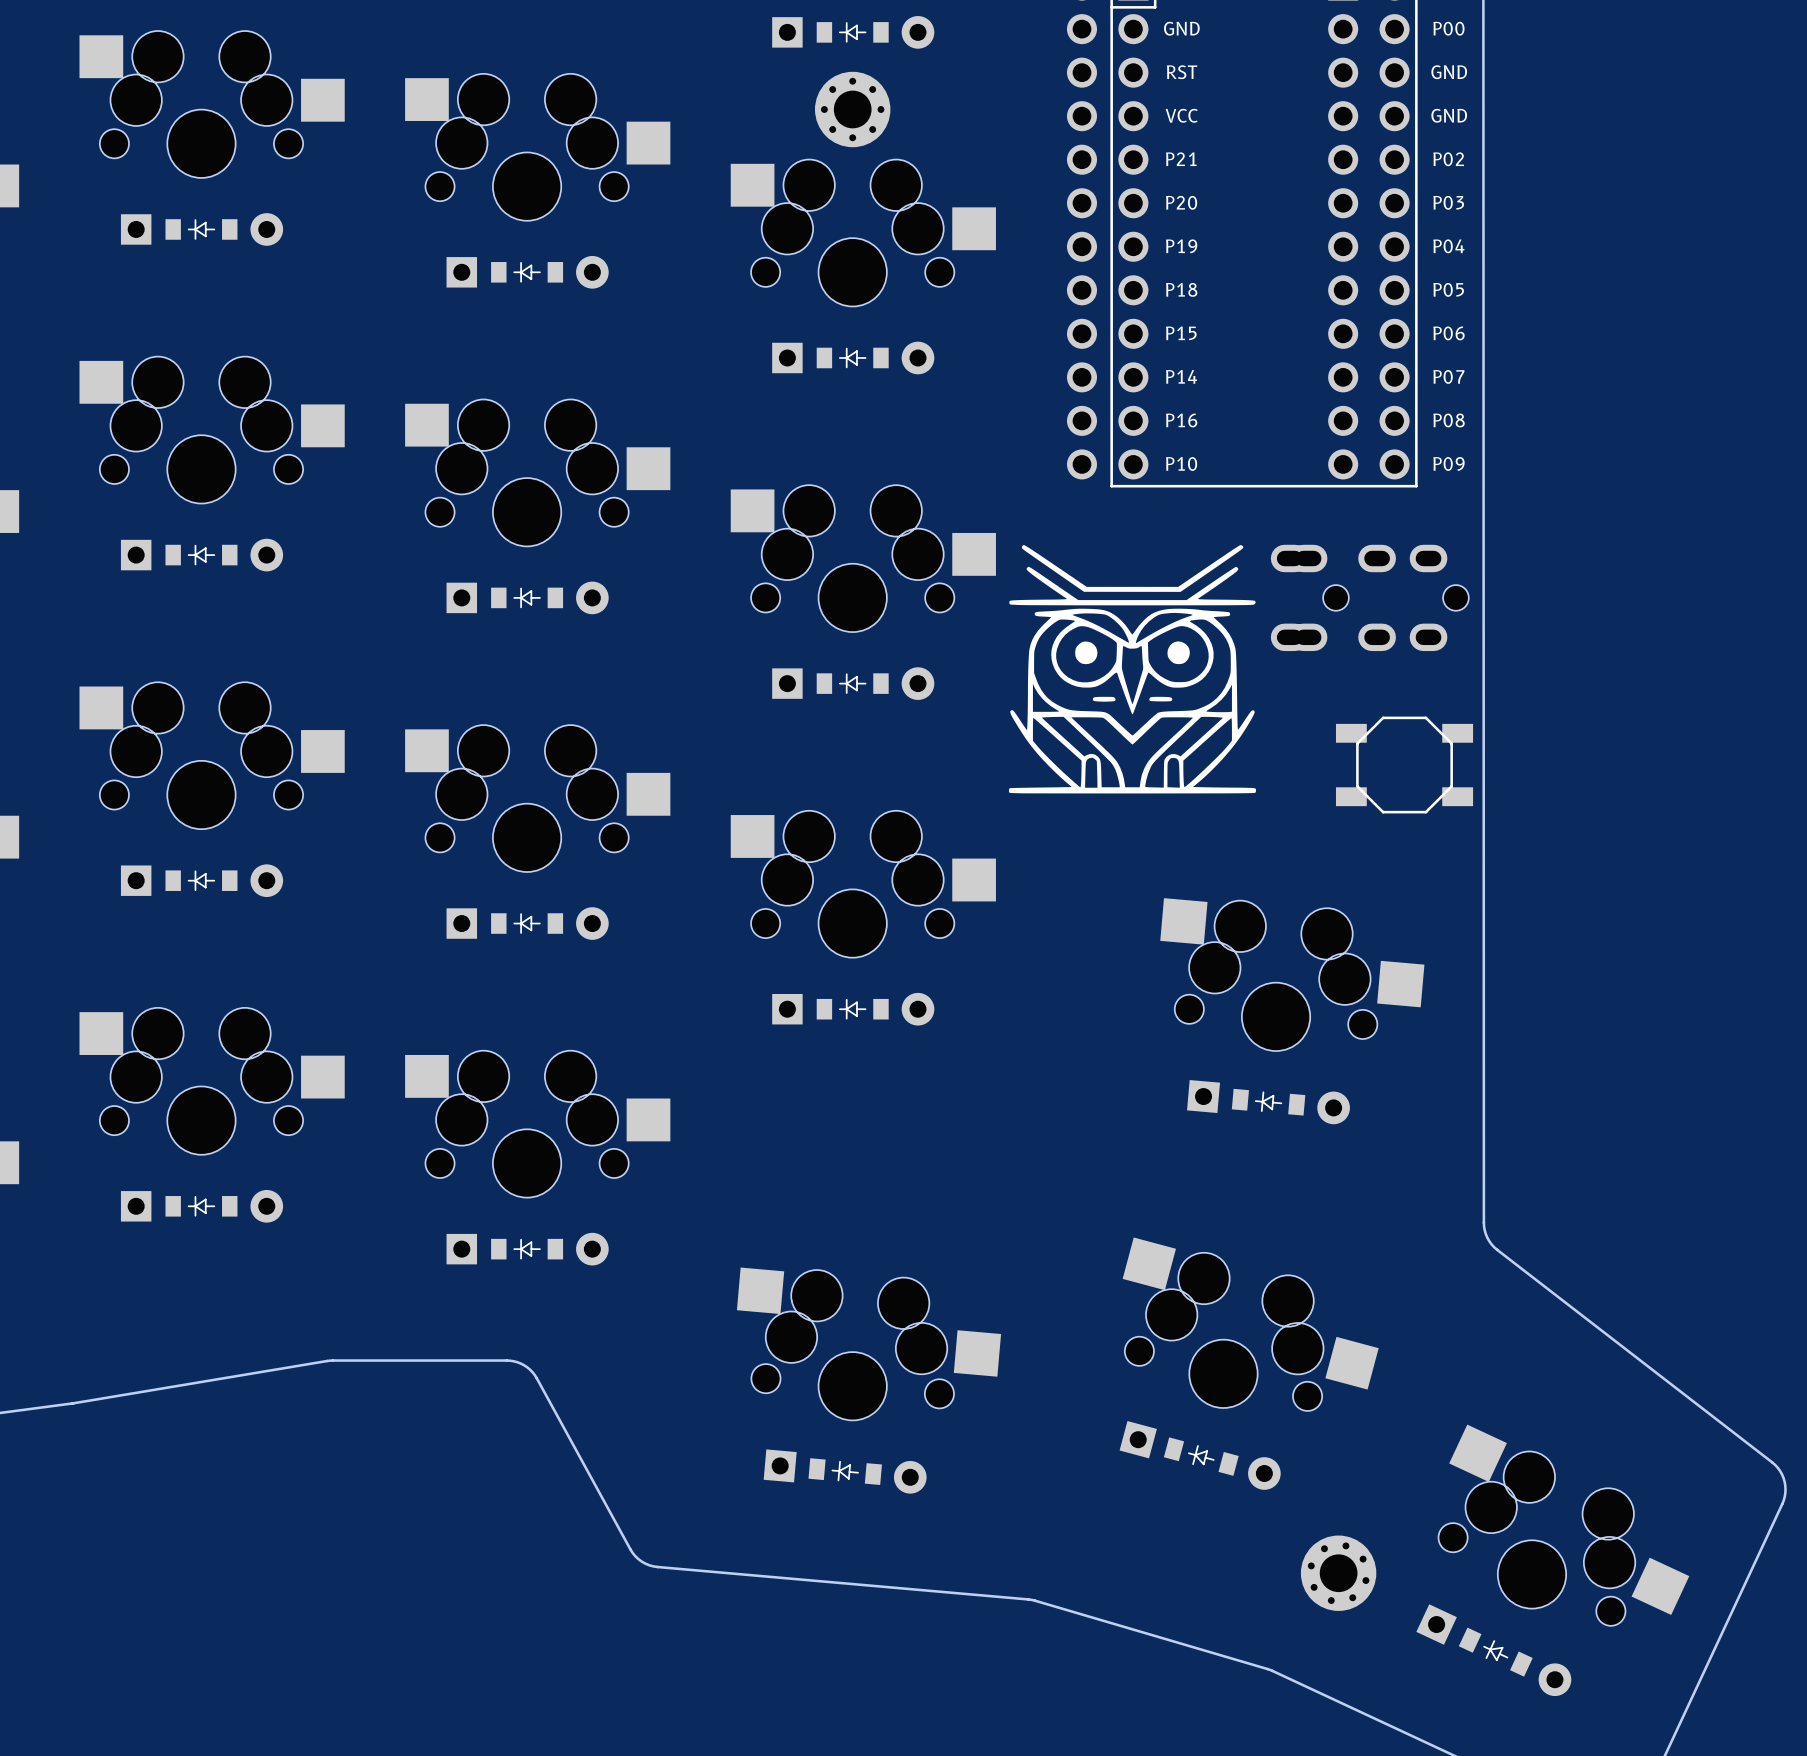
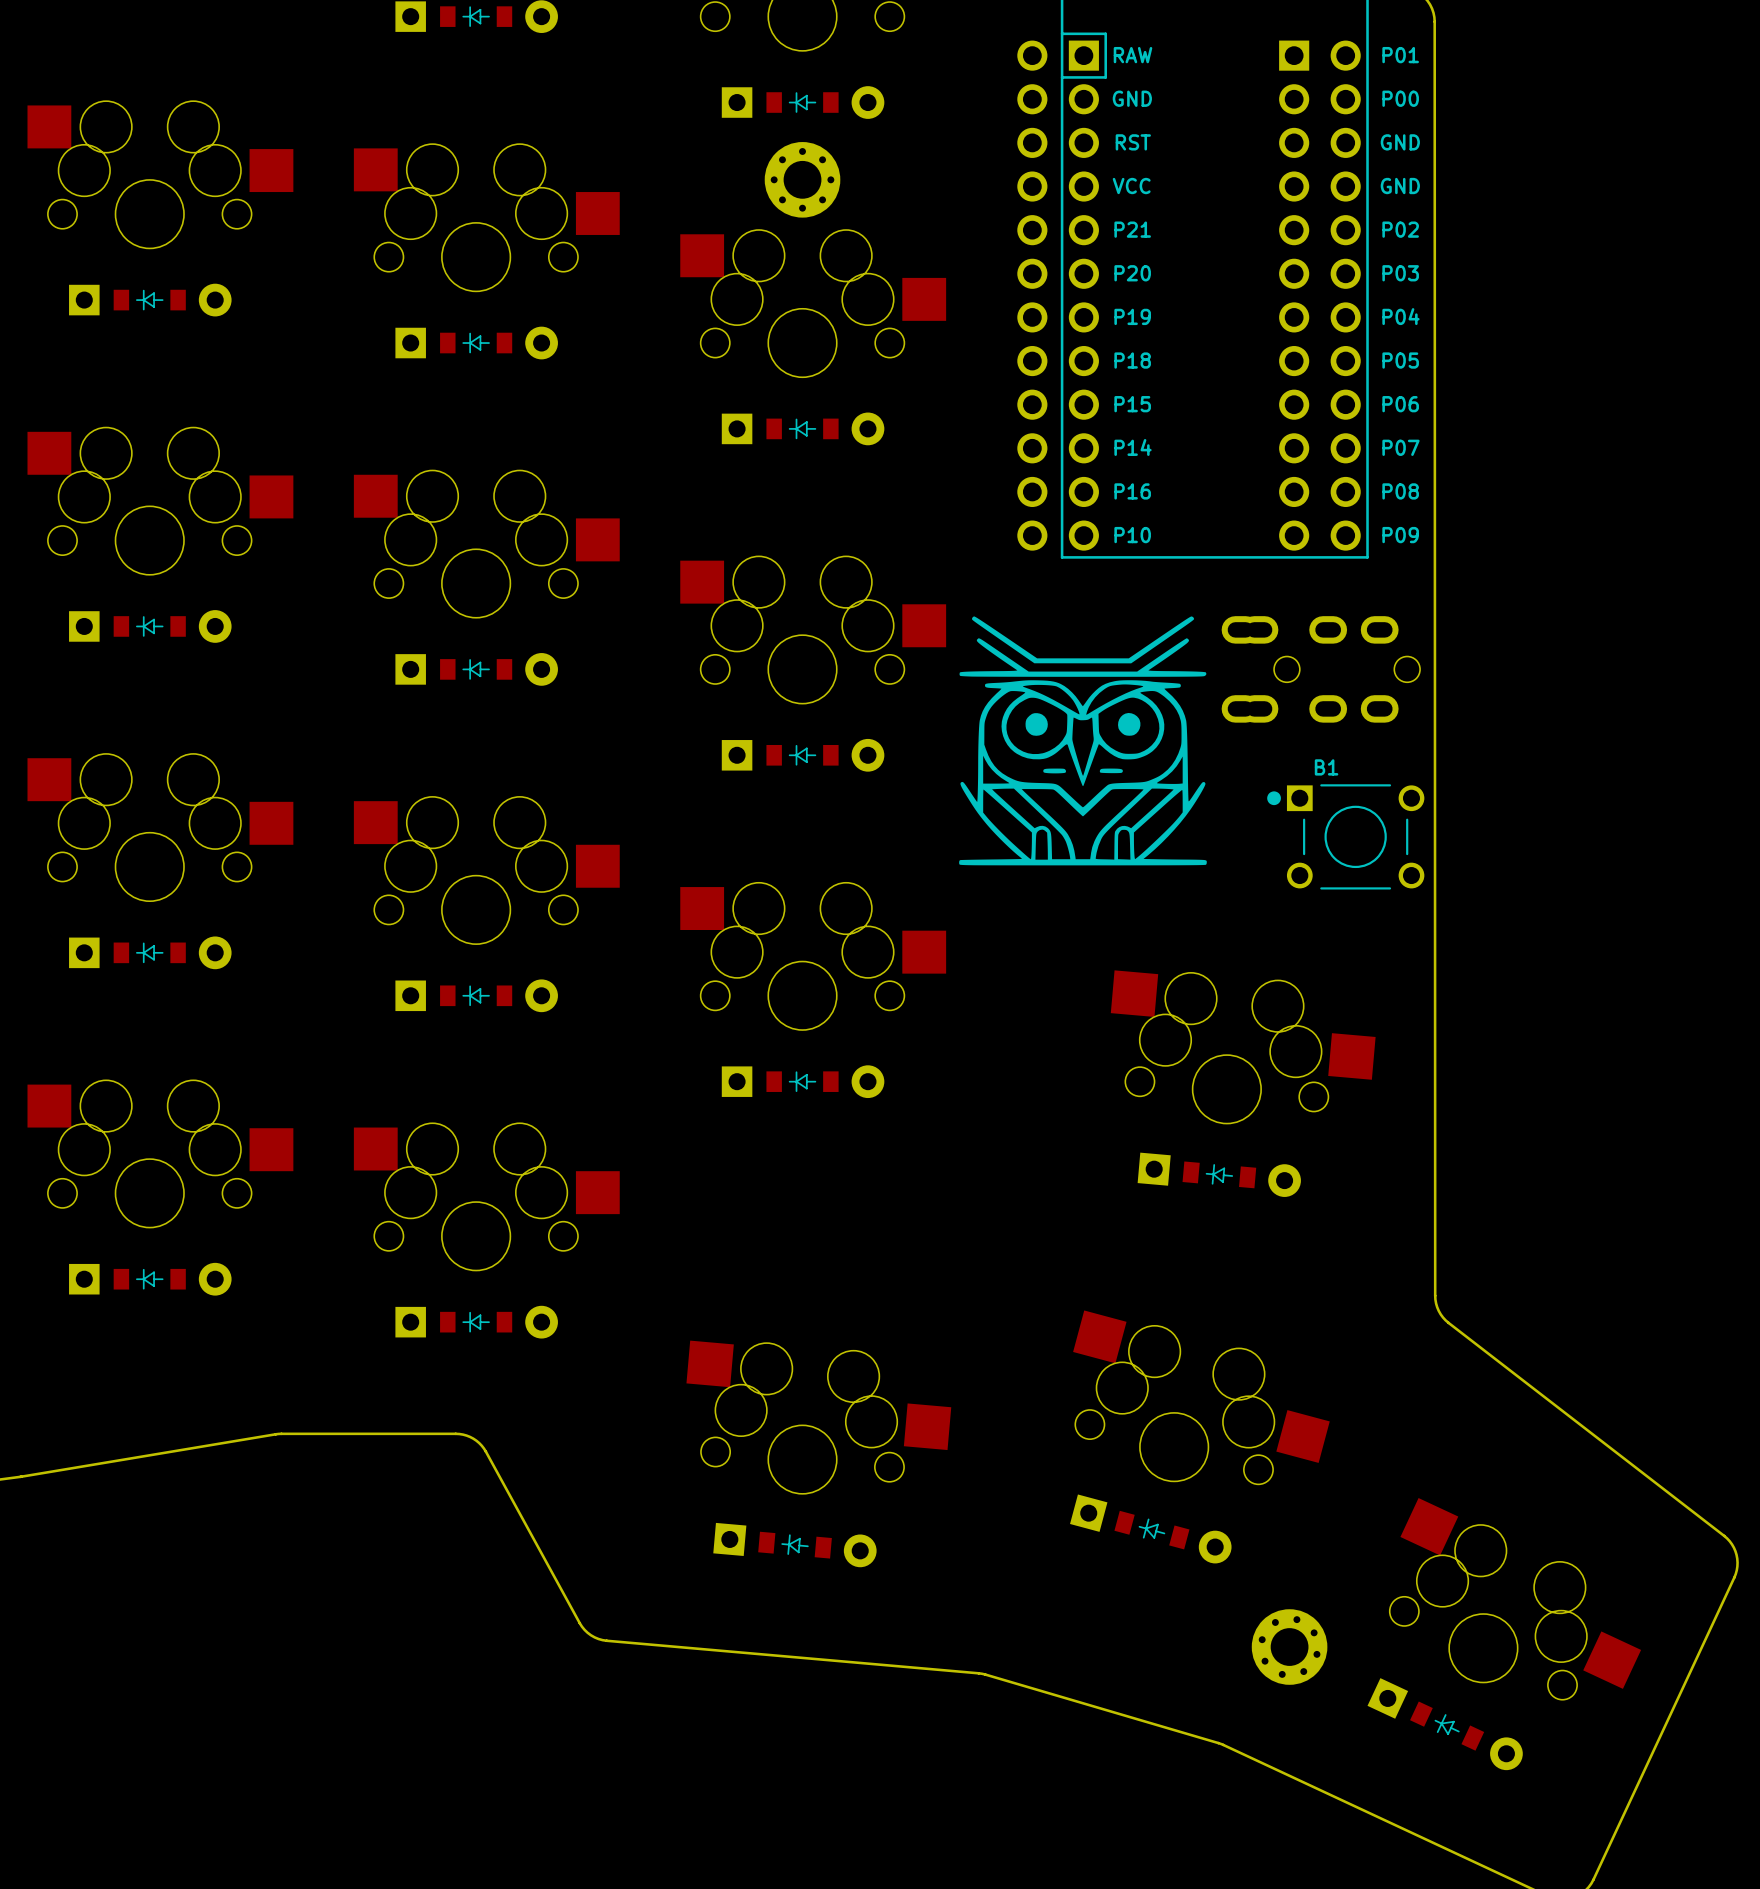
B1: none -> (1345, 836)
part: (1404, 765) -> none

